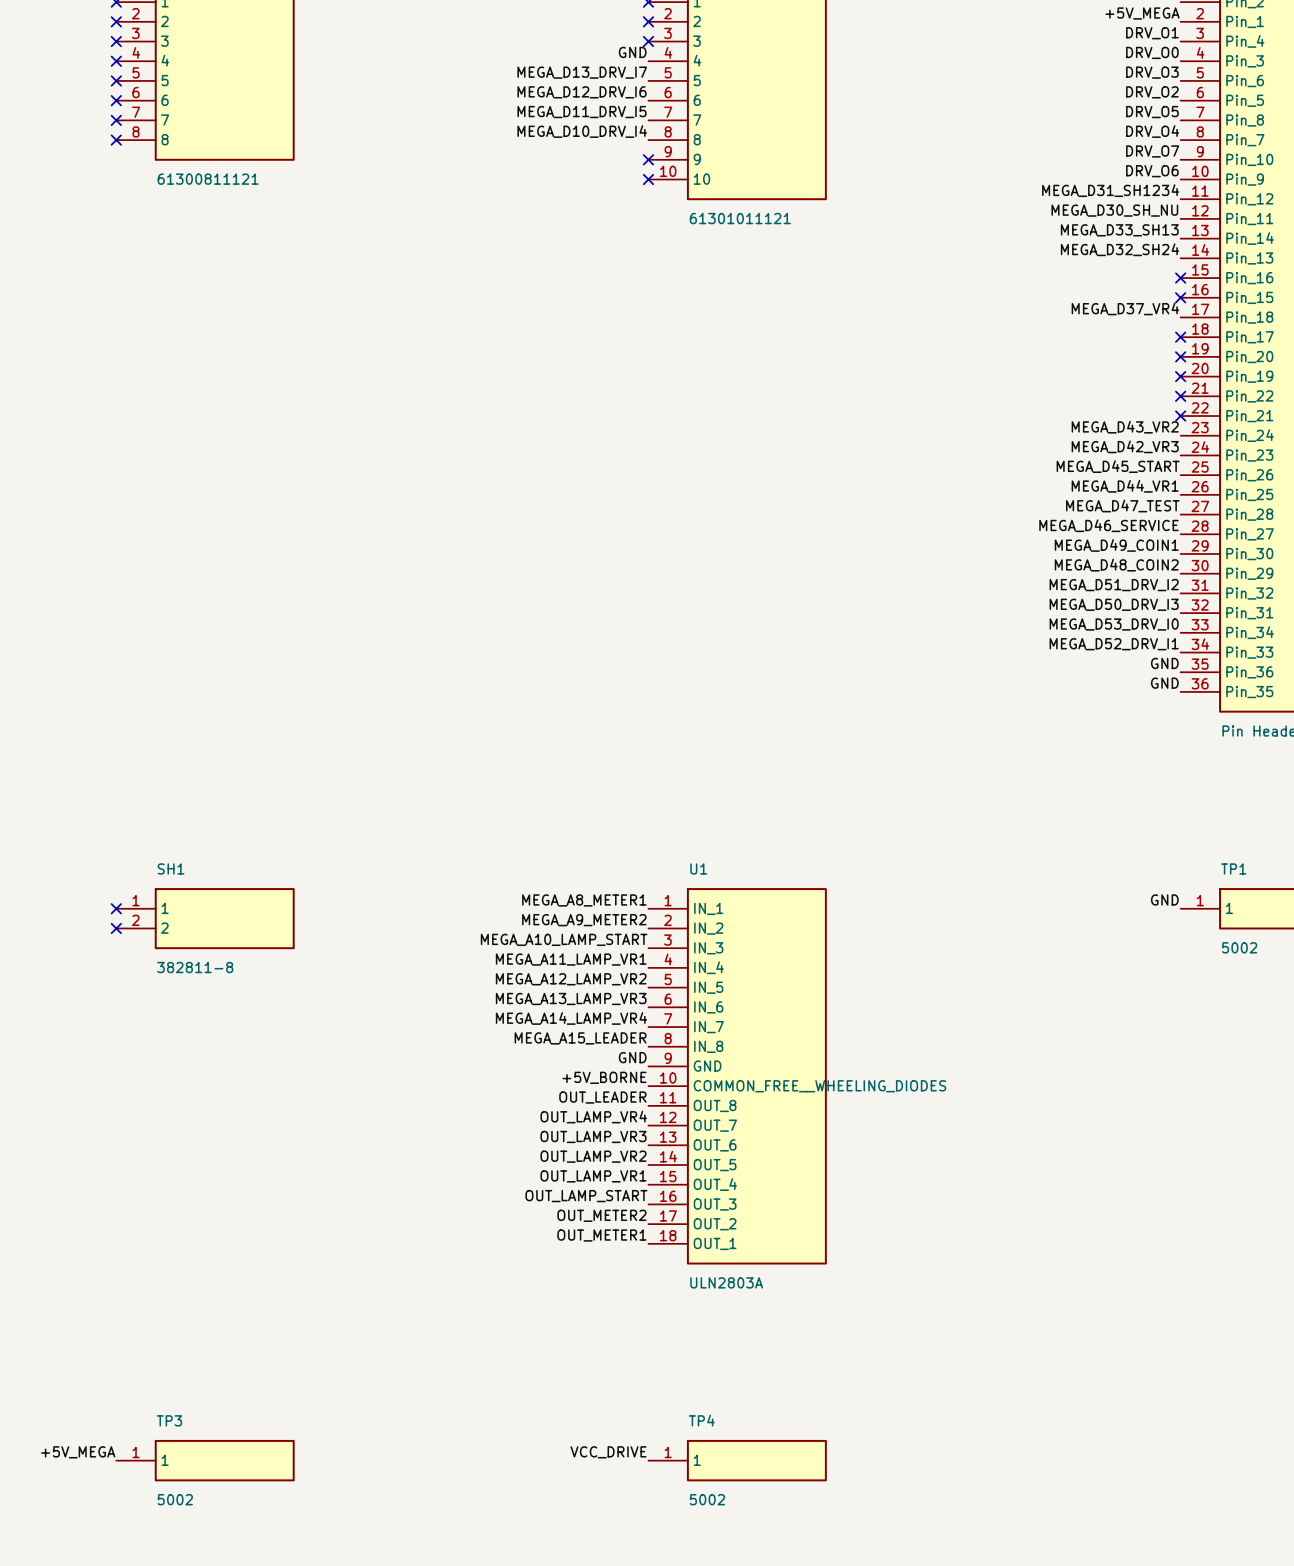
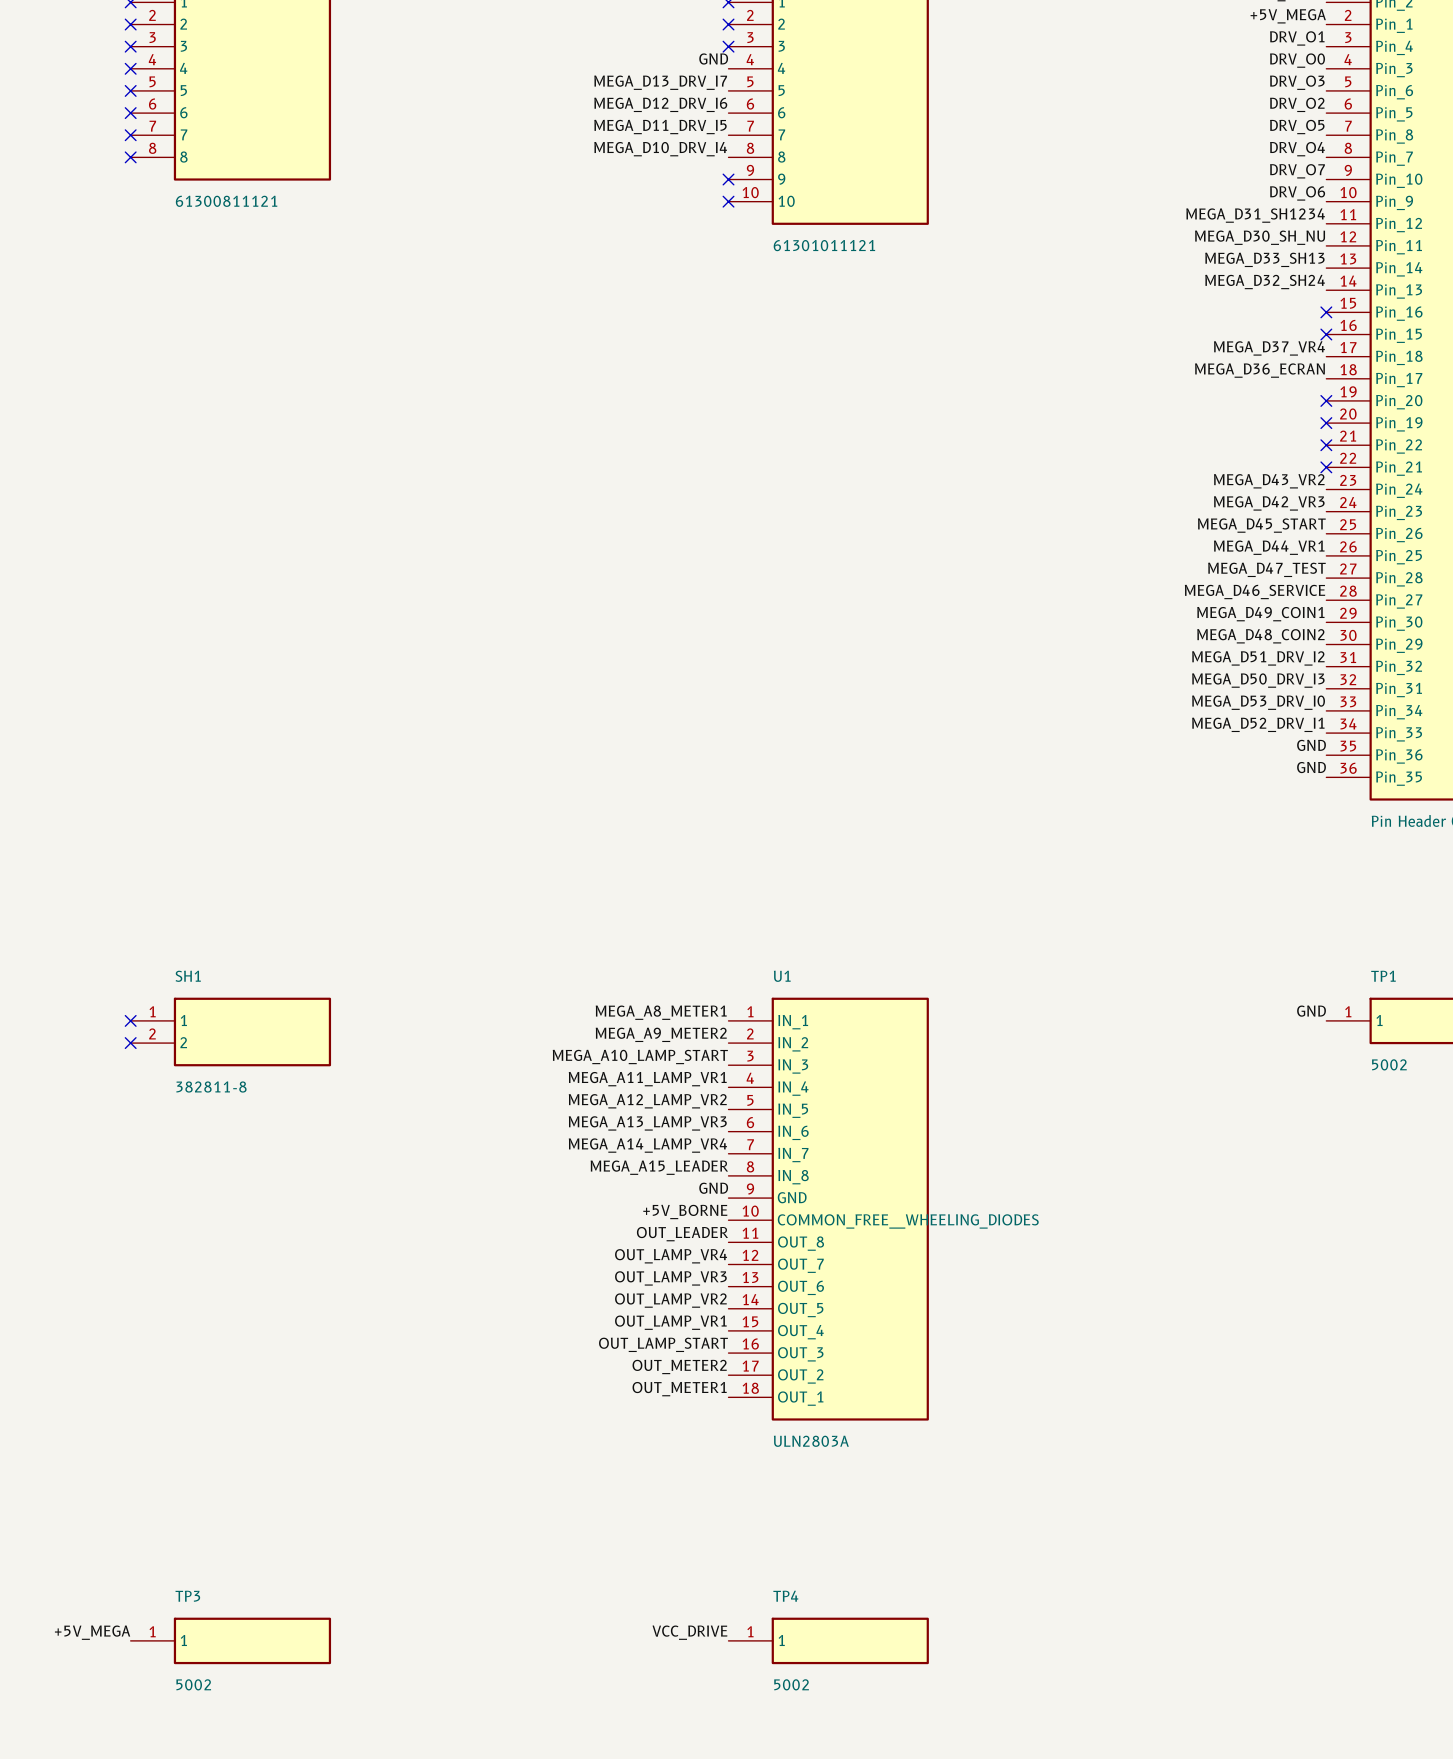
label: none -> MEGA_D36_ECRAN (1259, 370)
no-connect mark: (1180, 337) -> none

